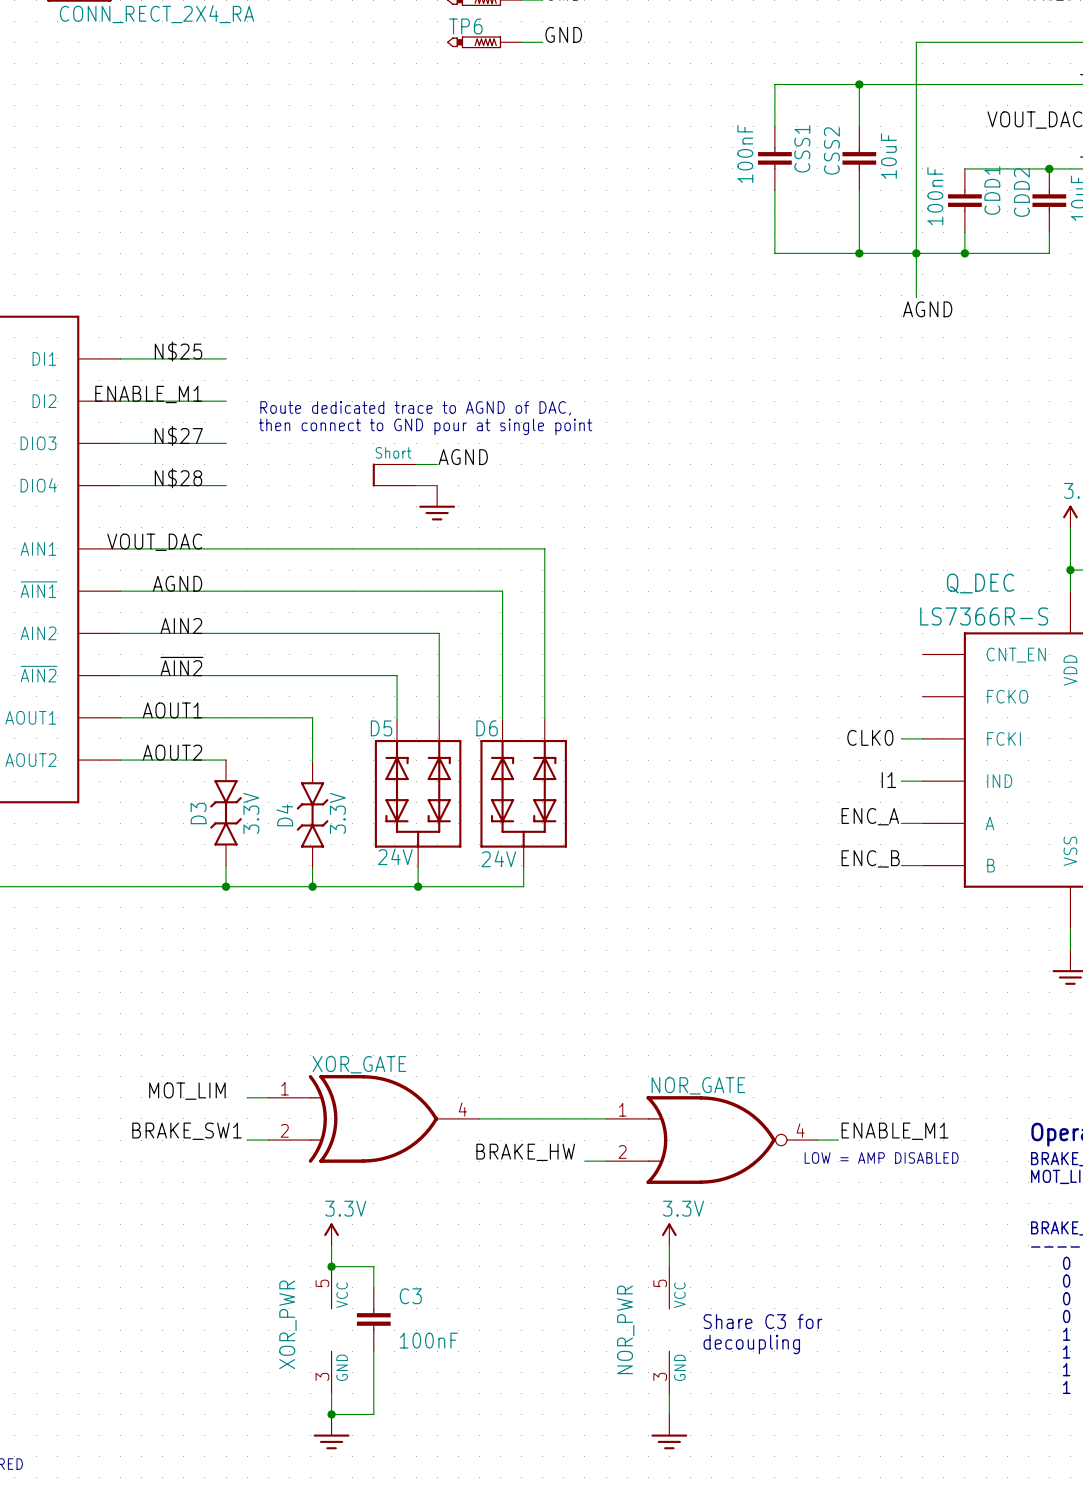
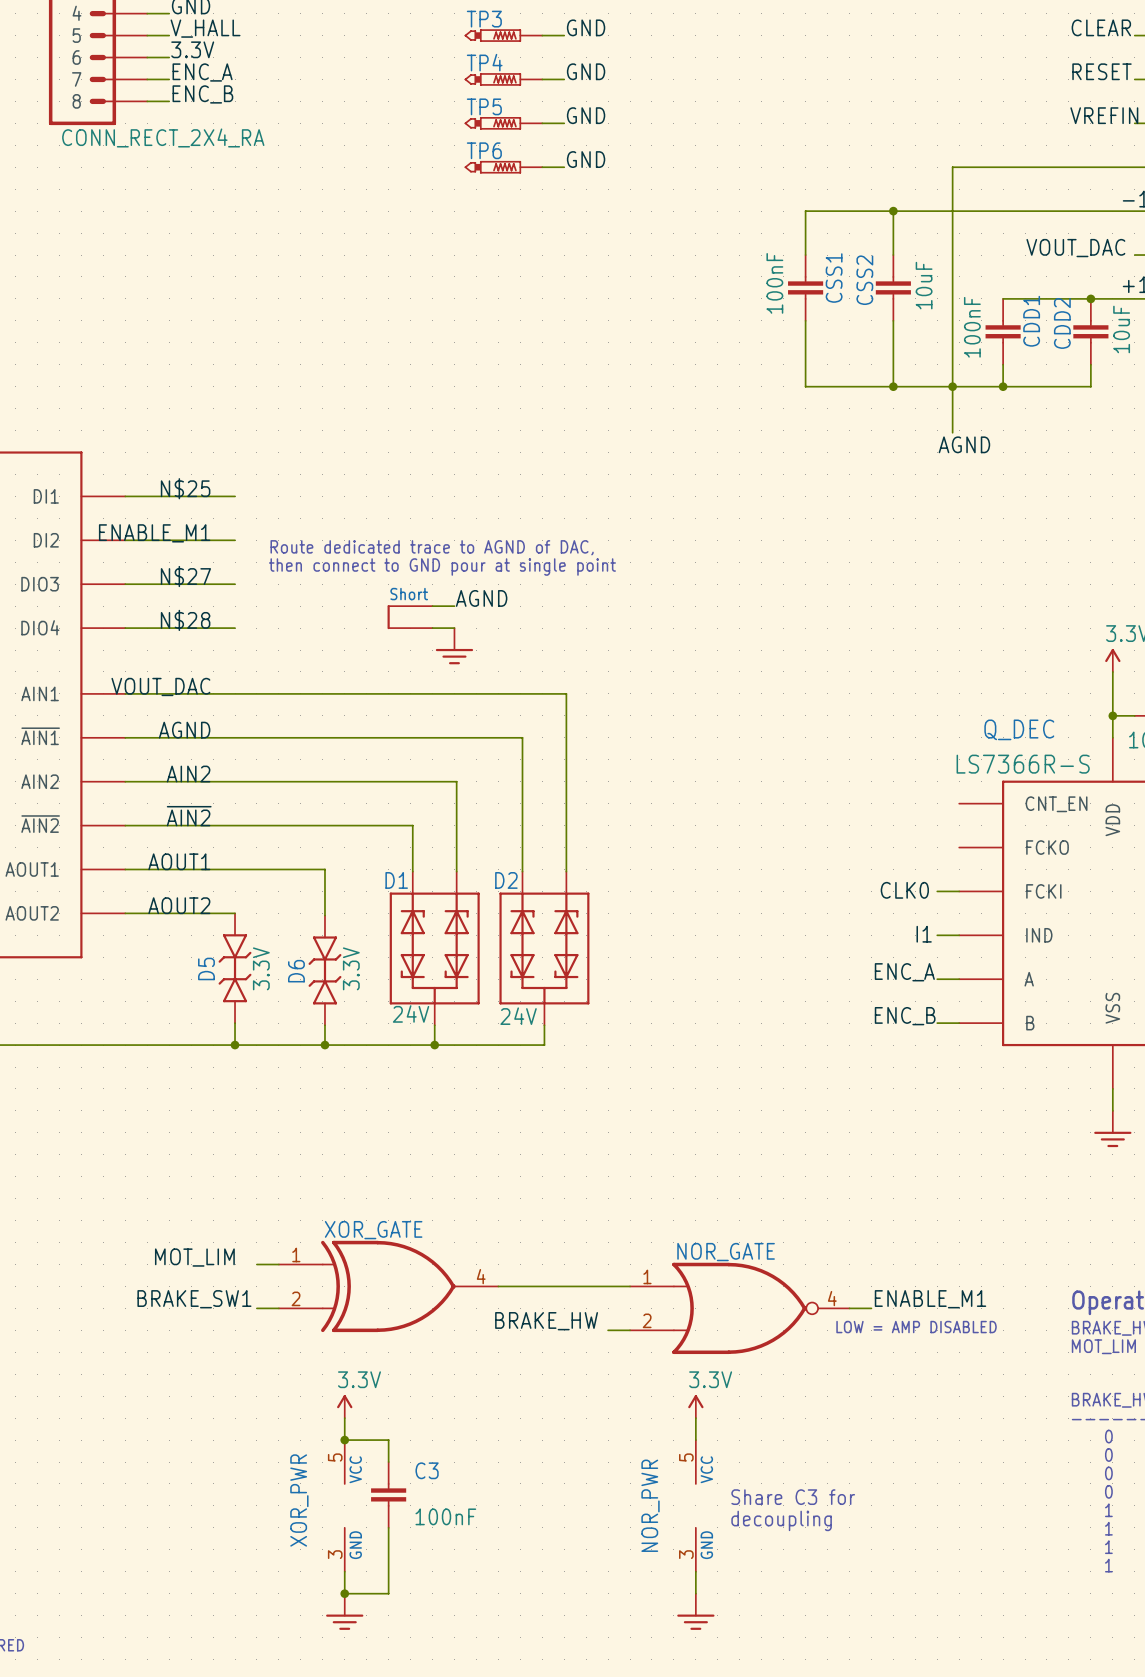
D5 name: D5 (381, 728) -> D1 (396, 880)
D6 name: D6 (487, 728) -> D2 (506, 880)
D3 name: D3 (198, 813) -> D5 (206, 968)
D4 name: D4 (284, 815) -> D6 (296, 971)

